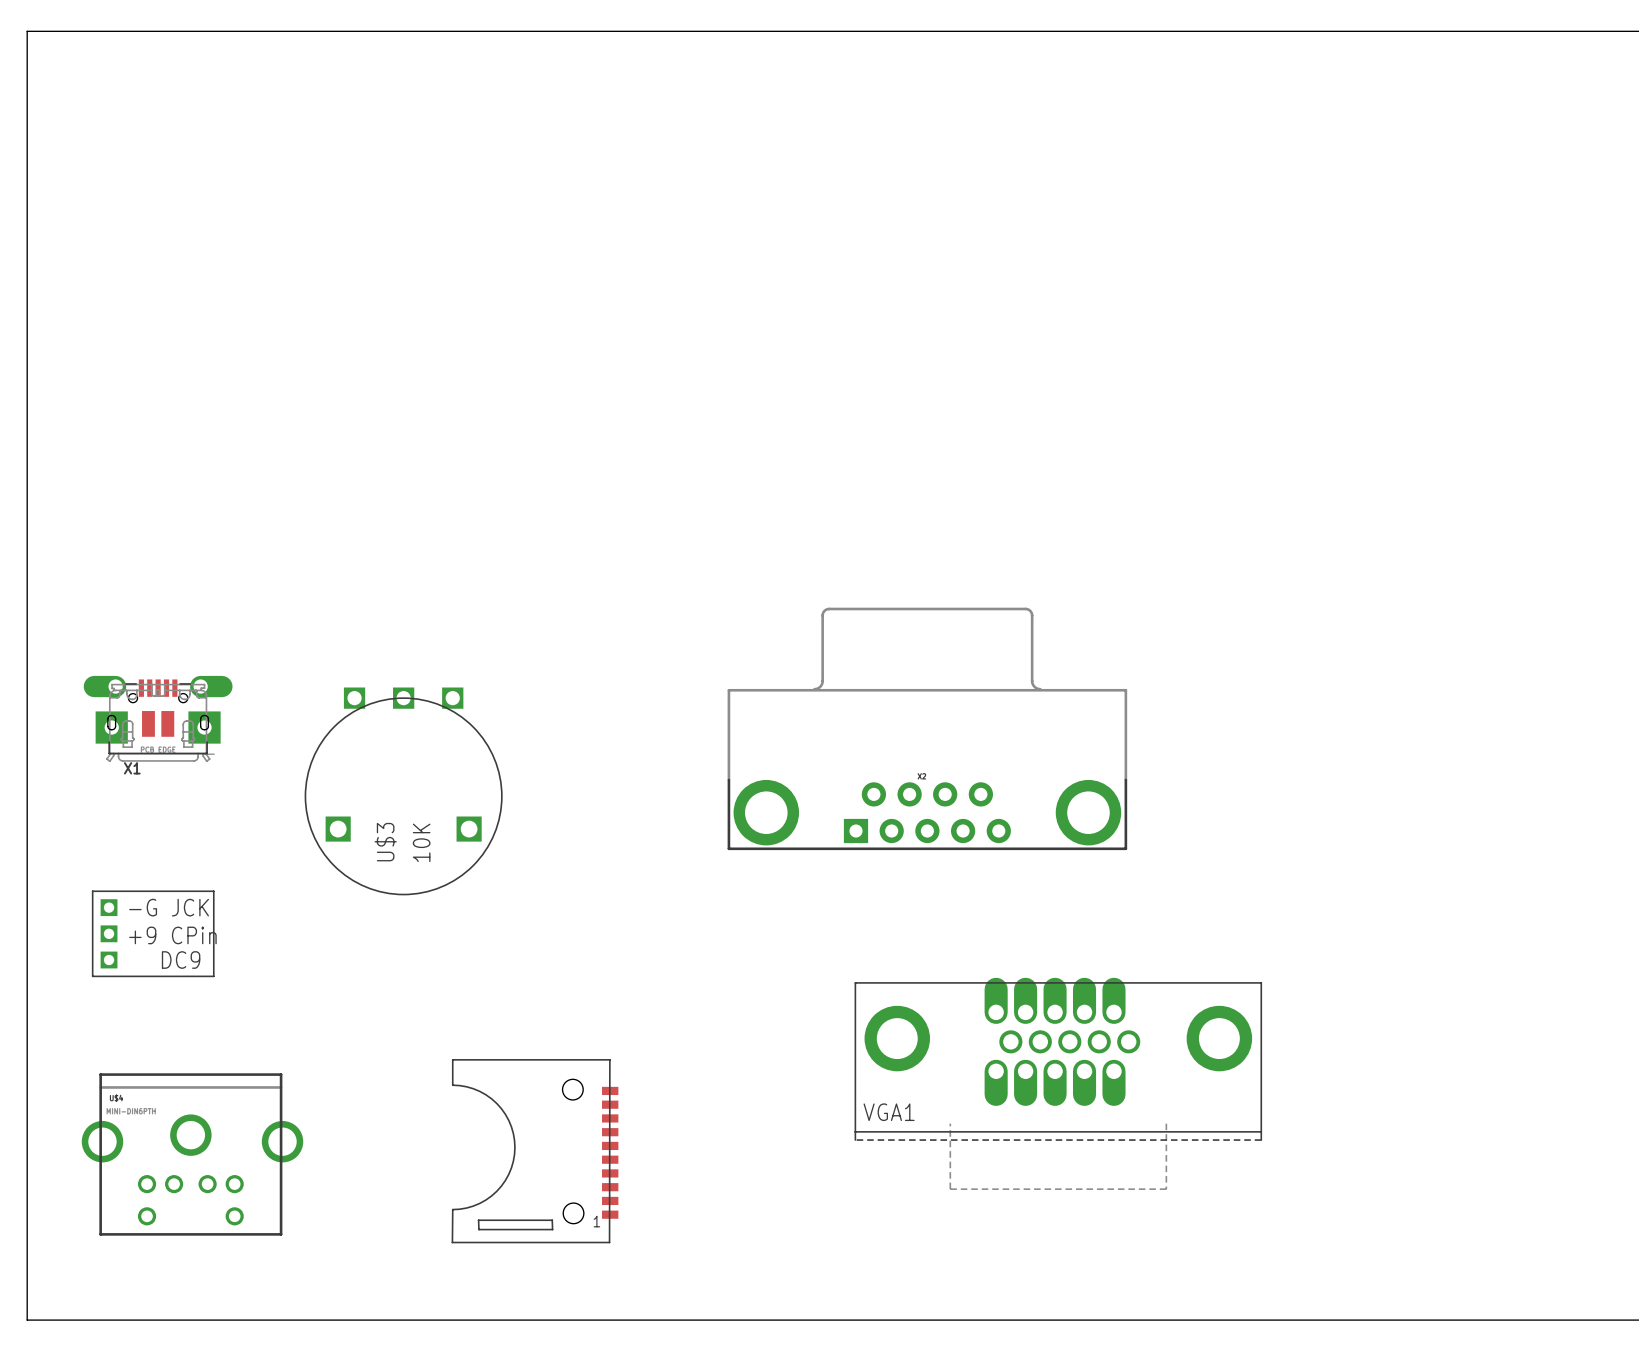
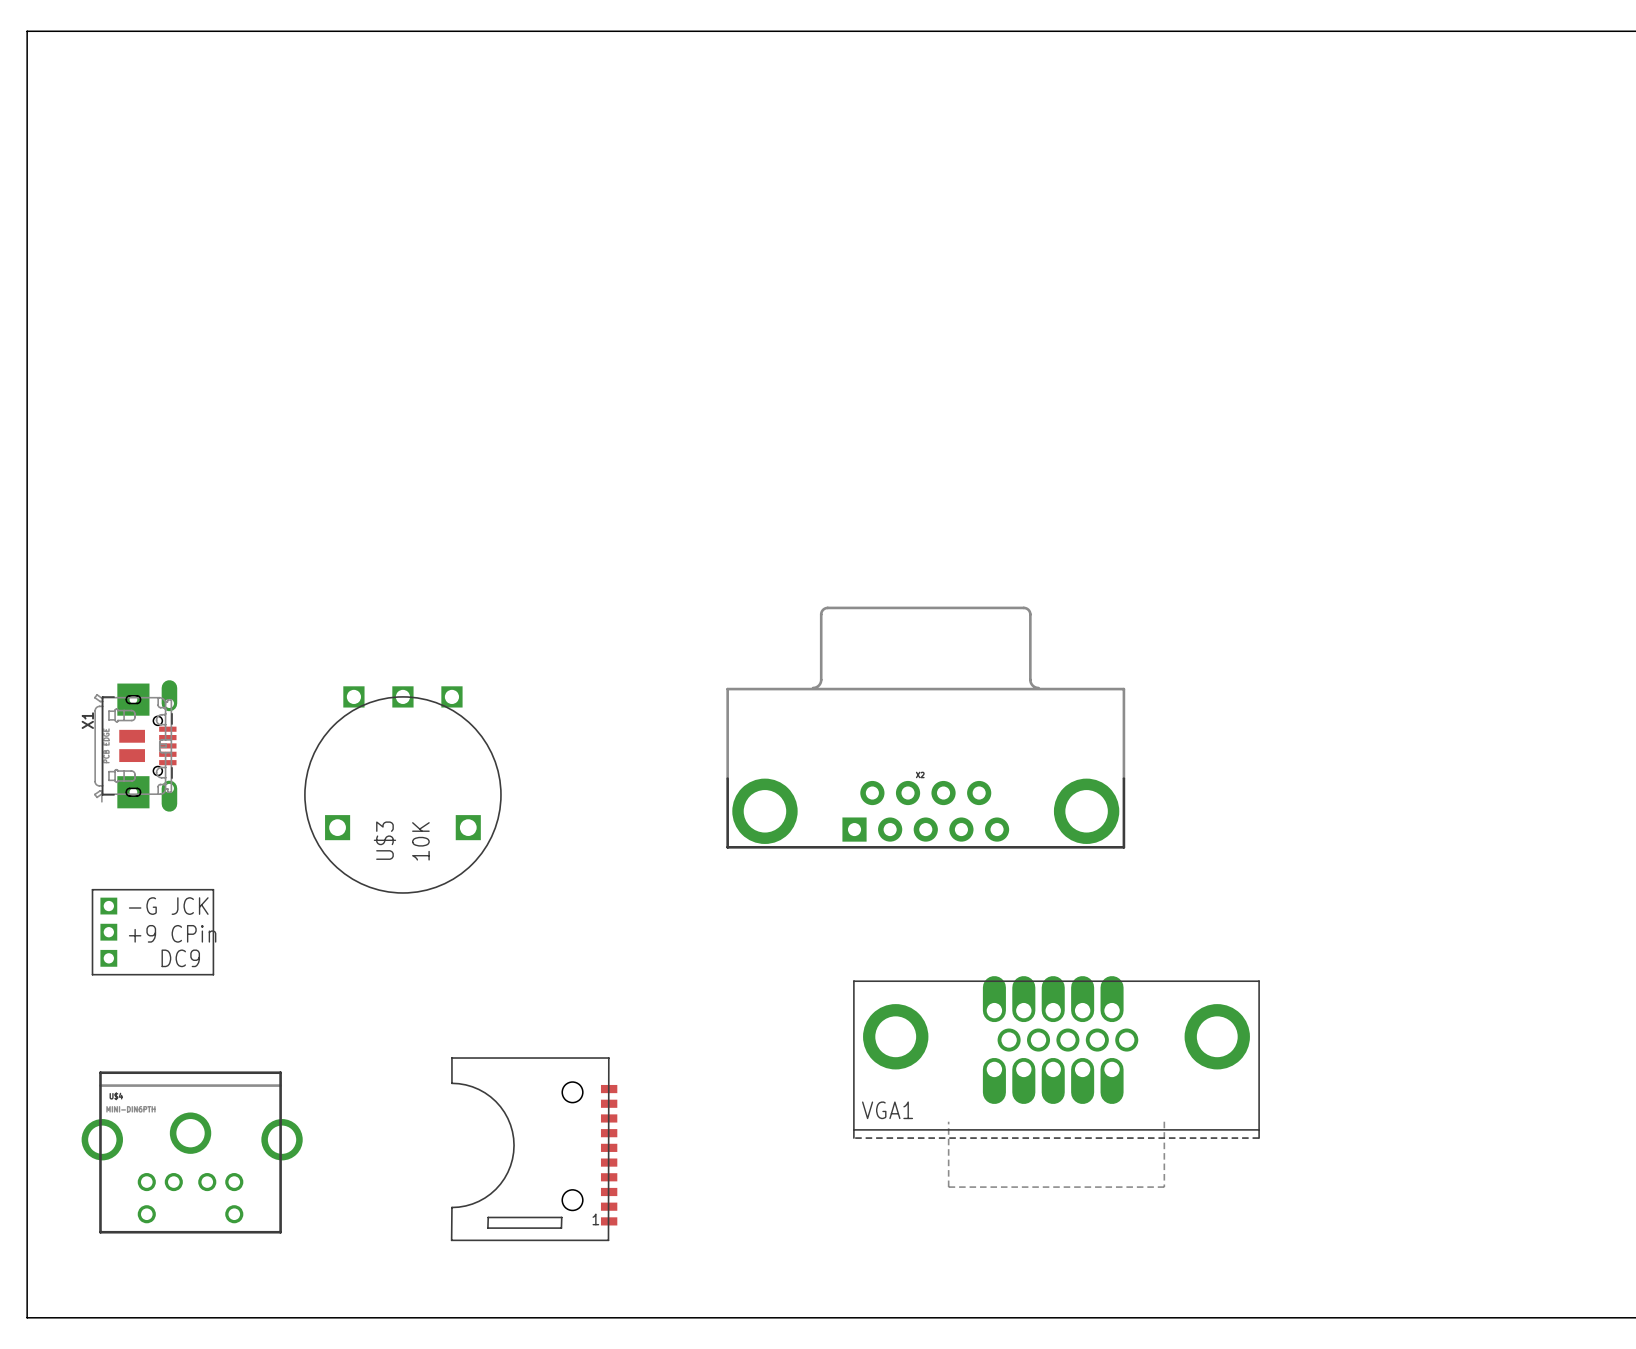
X1 footprint: [83, 675, 233, 763] -> [94, 680, 178, 812]
X1 name position: X1 (132, 768) -> X1 (87, 720)
part footprint: [451, 1059, 619, 1244] -> [450, 1057, 618, 1242]

